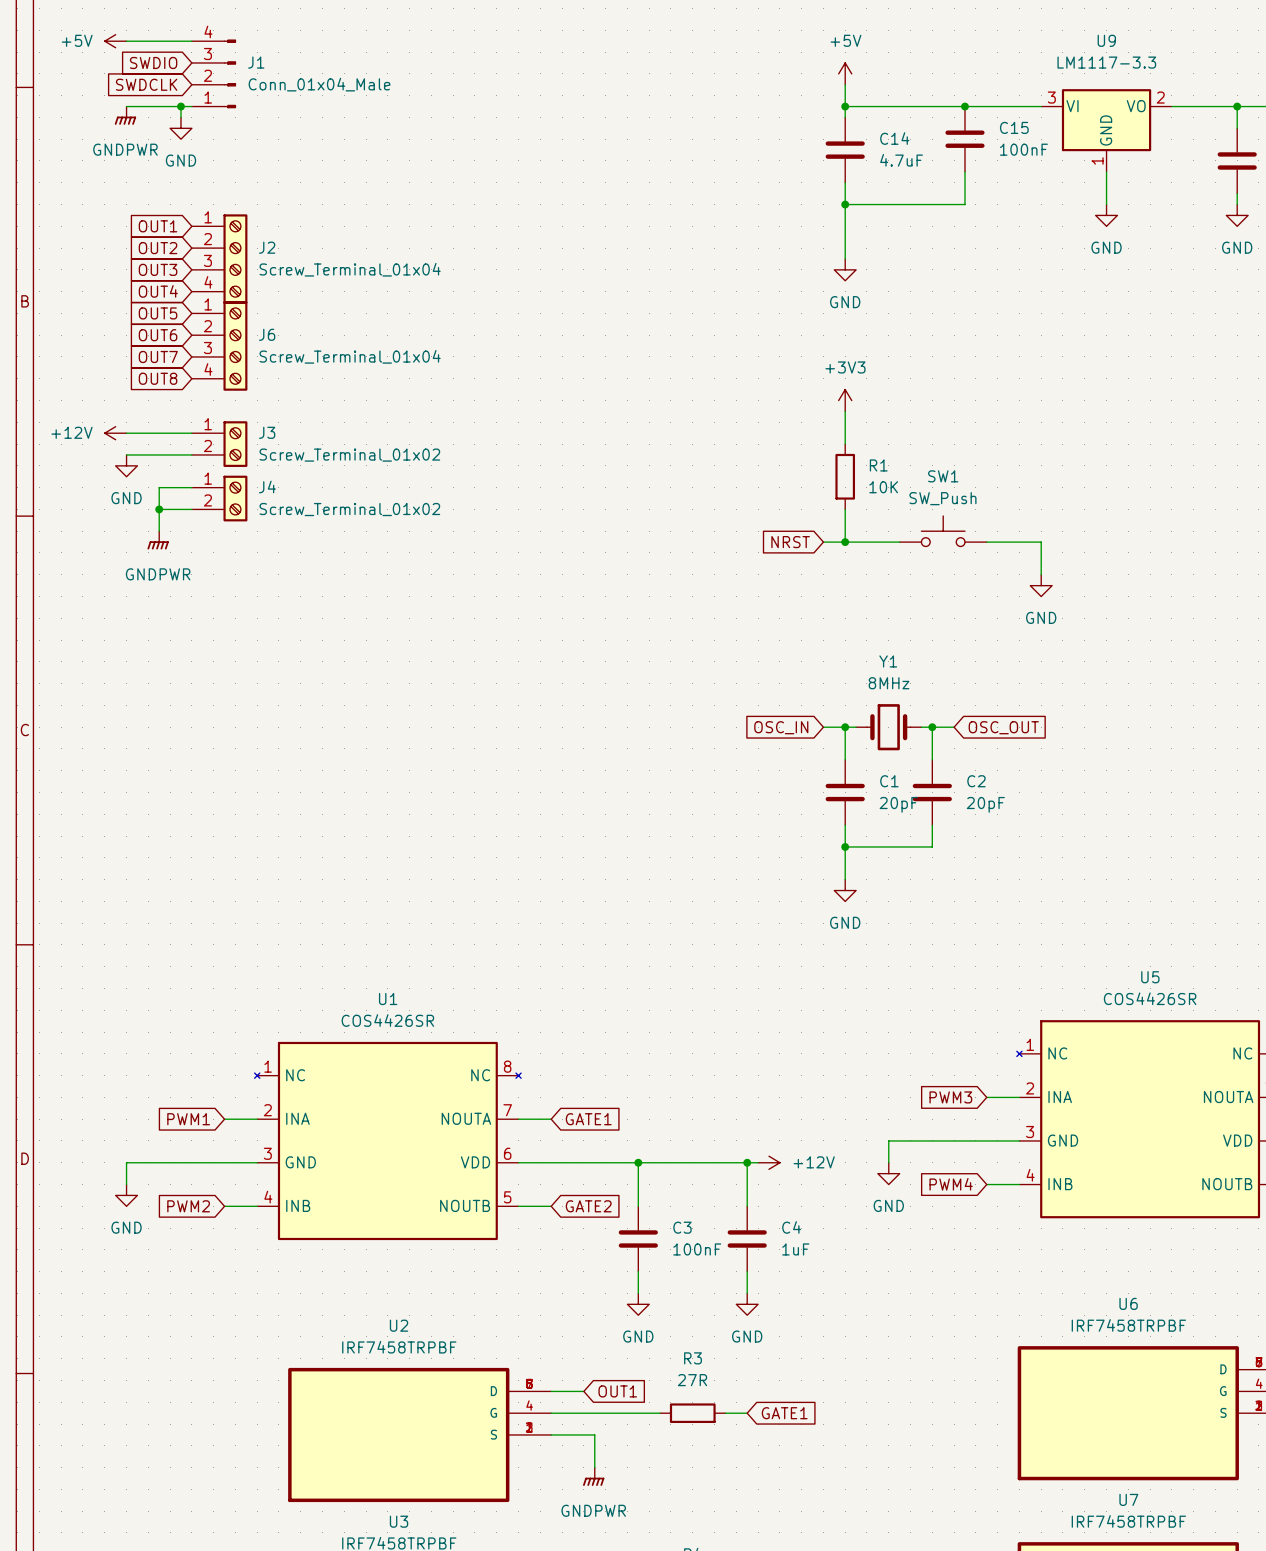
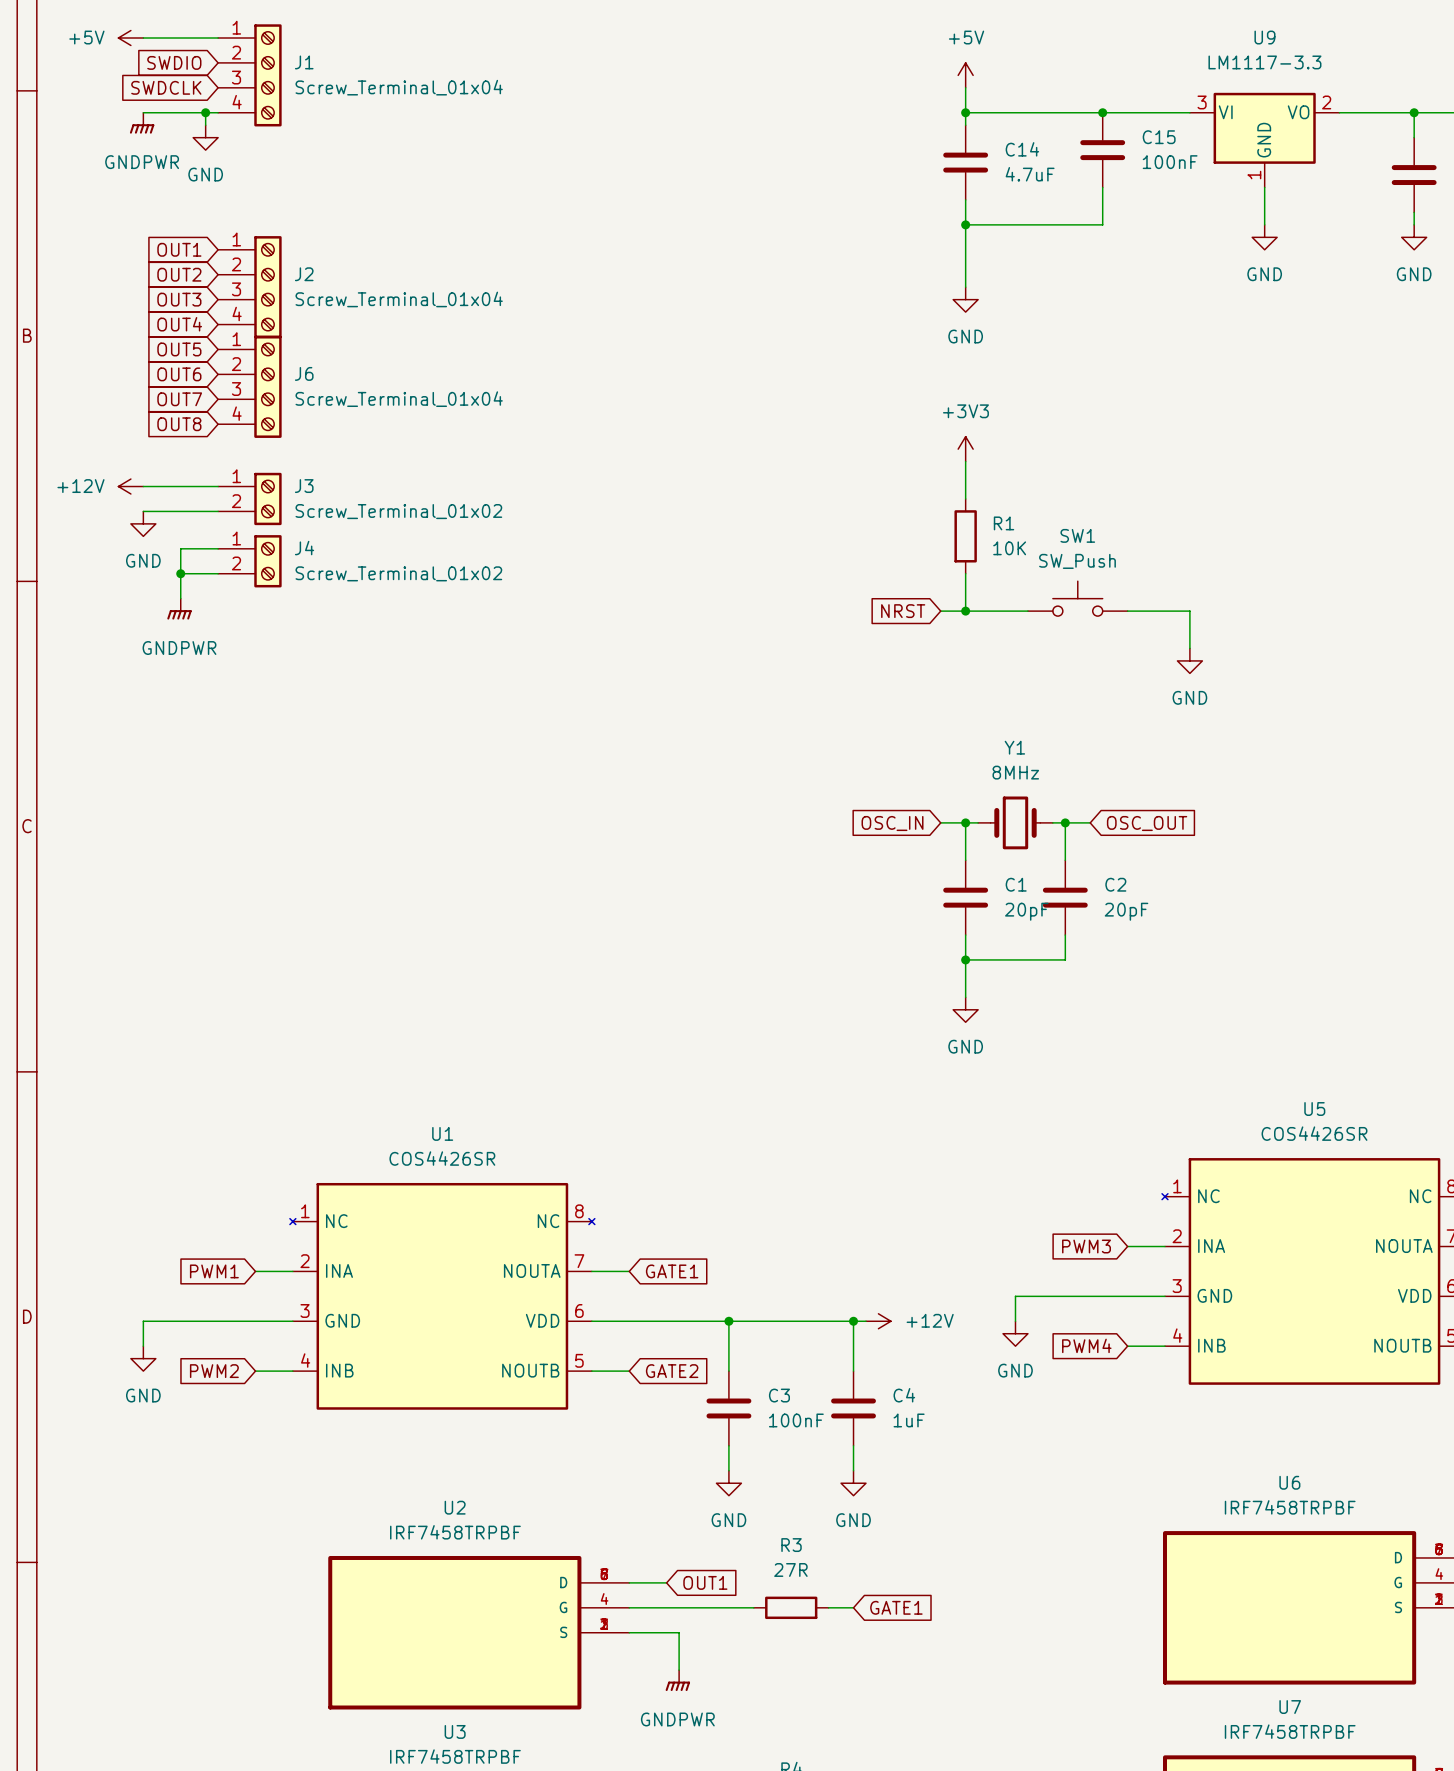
J1 symbol: [191, 39, 237, 109] -> [218, 24, 282, 127]
J1 value: Conn_01x04_Male (319, 84) -> Screw_Terminal_01x04 (399, 87)

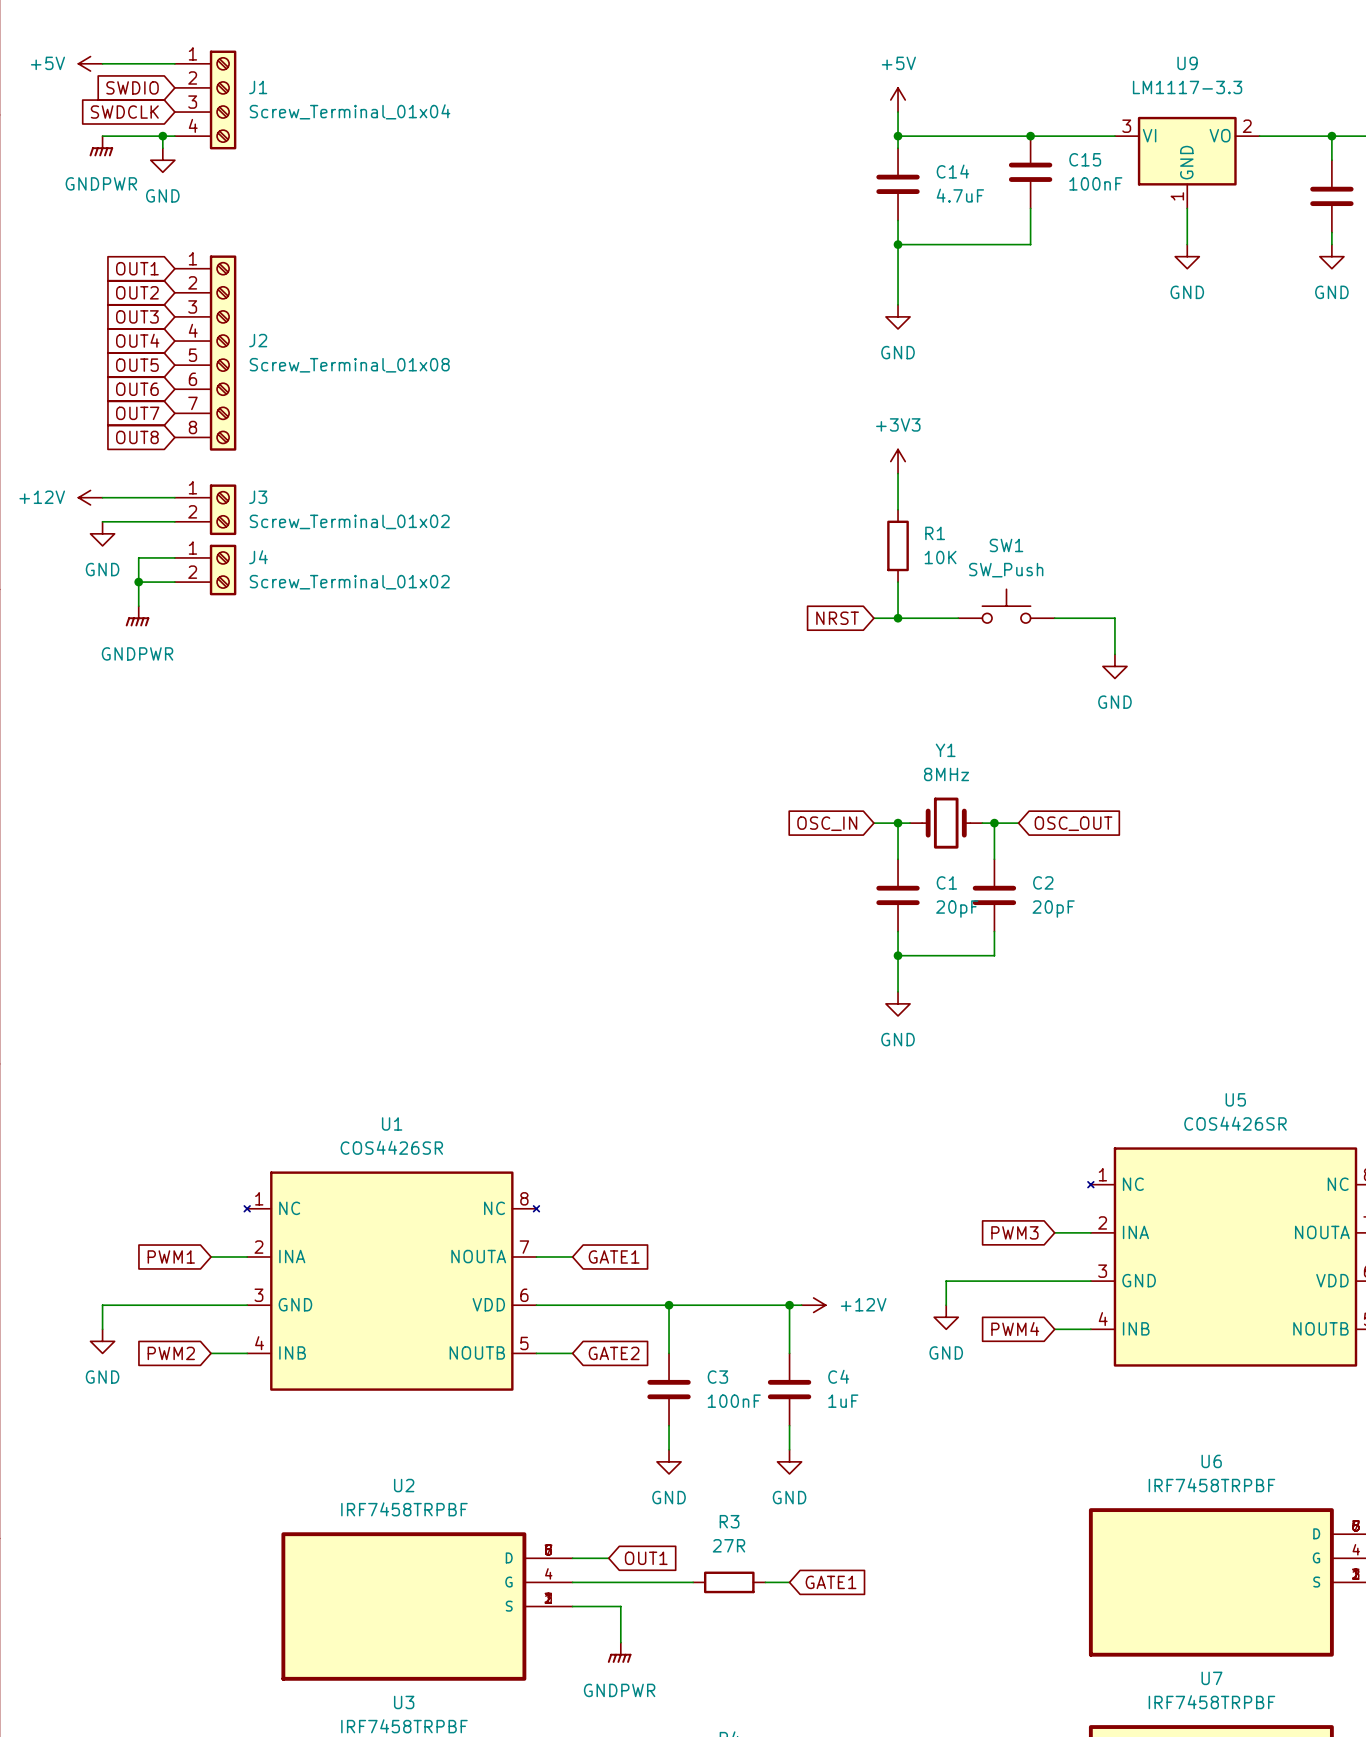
J2 symbol: [218, 236, 282, 339] -> [174, 255, 237, 451]
J2 value: Screw_Terminal_01x04 (399, 299) -> Screw_Terminal_01x08 (349, 365)
J6: Screw_Terminal_01x04 (249, 386) -> none

